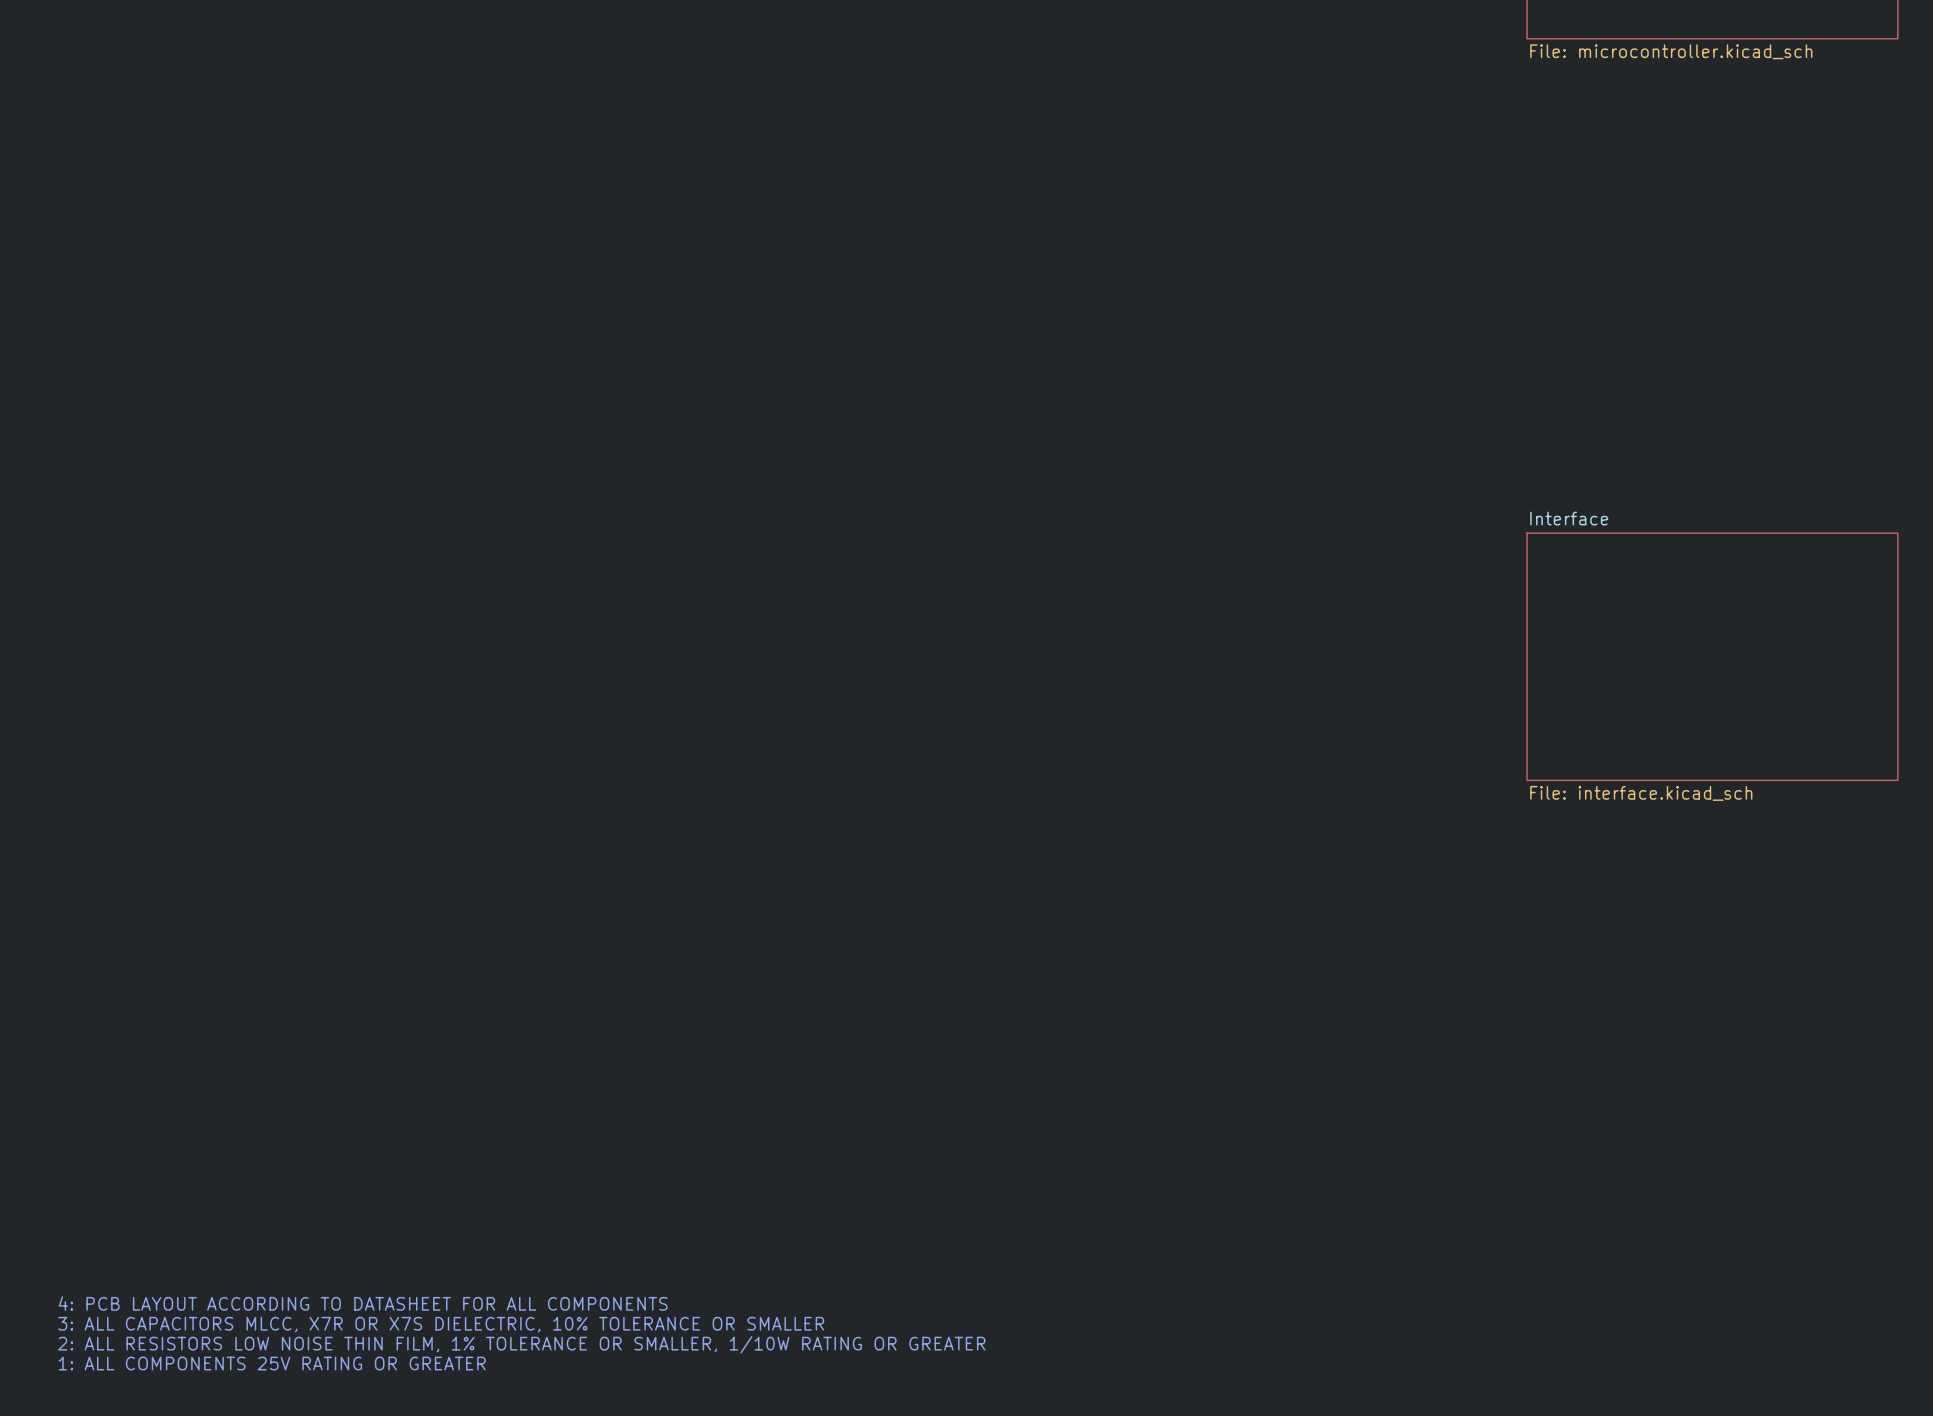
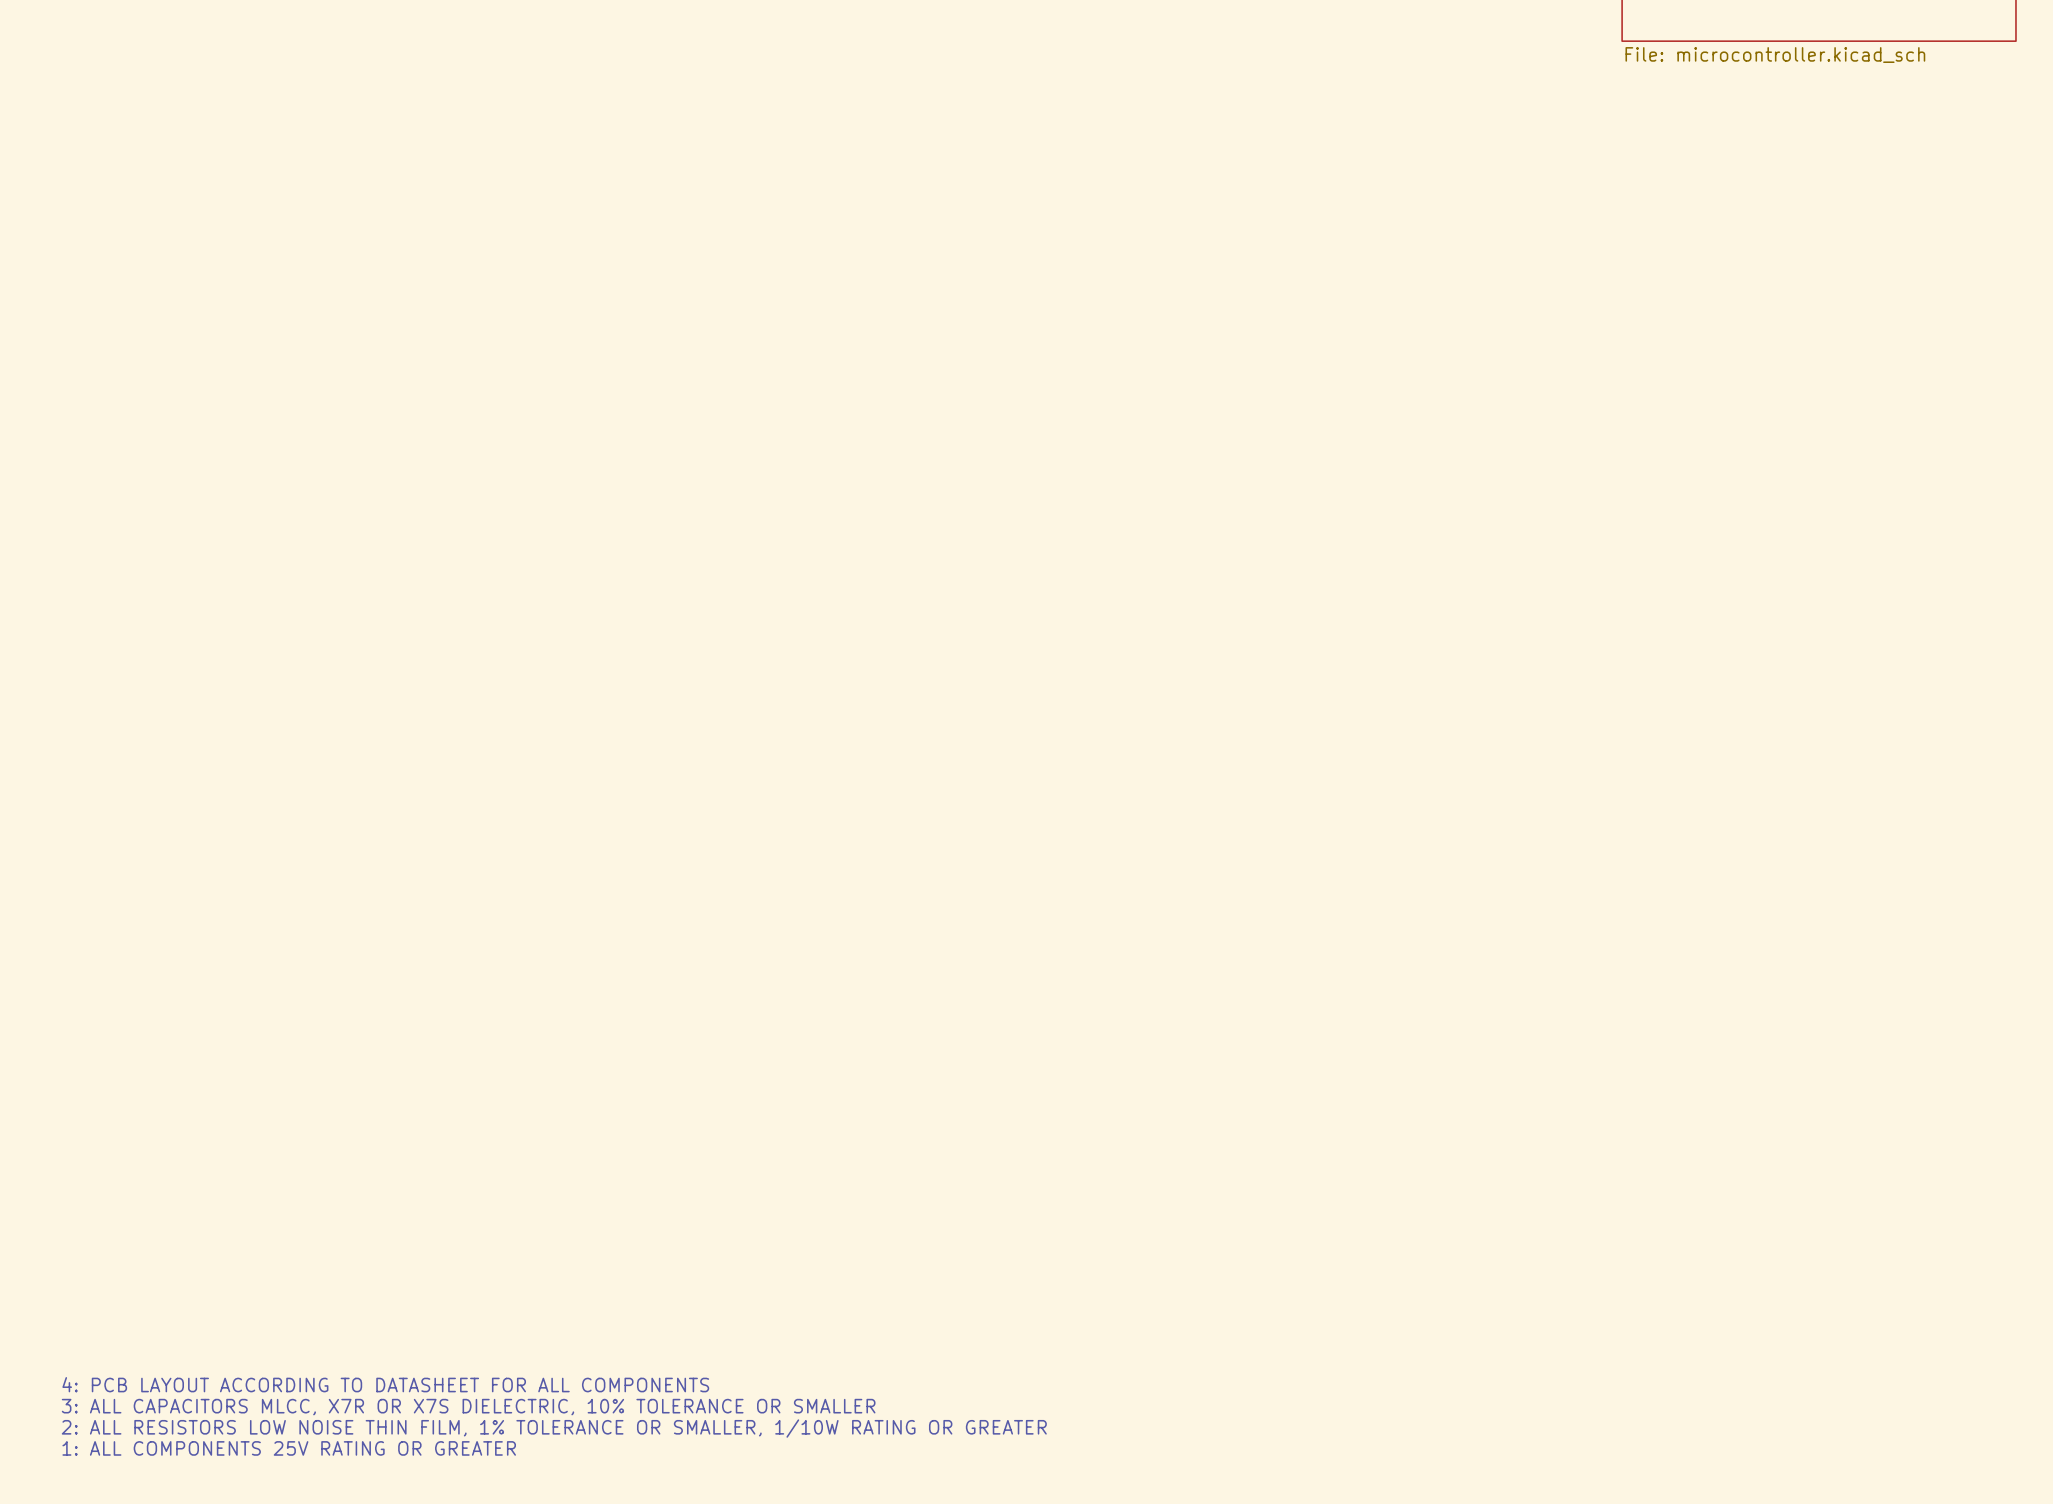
sheet Interface: File: interface.kicad_sch (1712, 656) -> none

